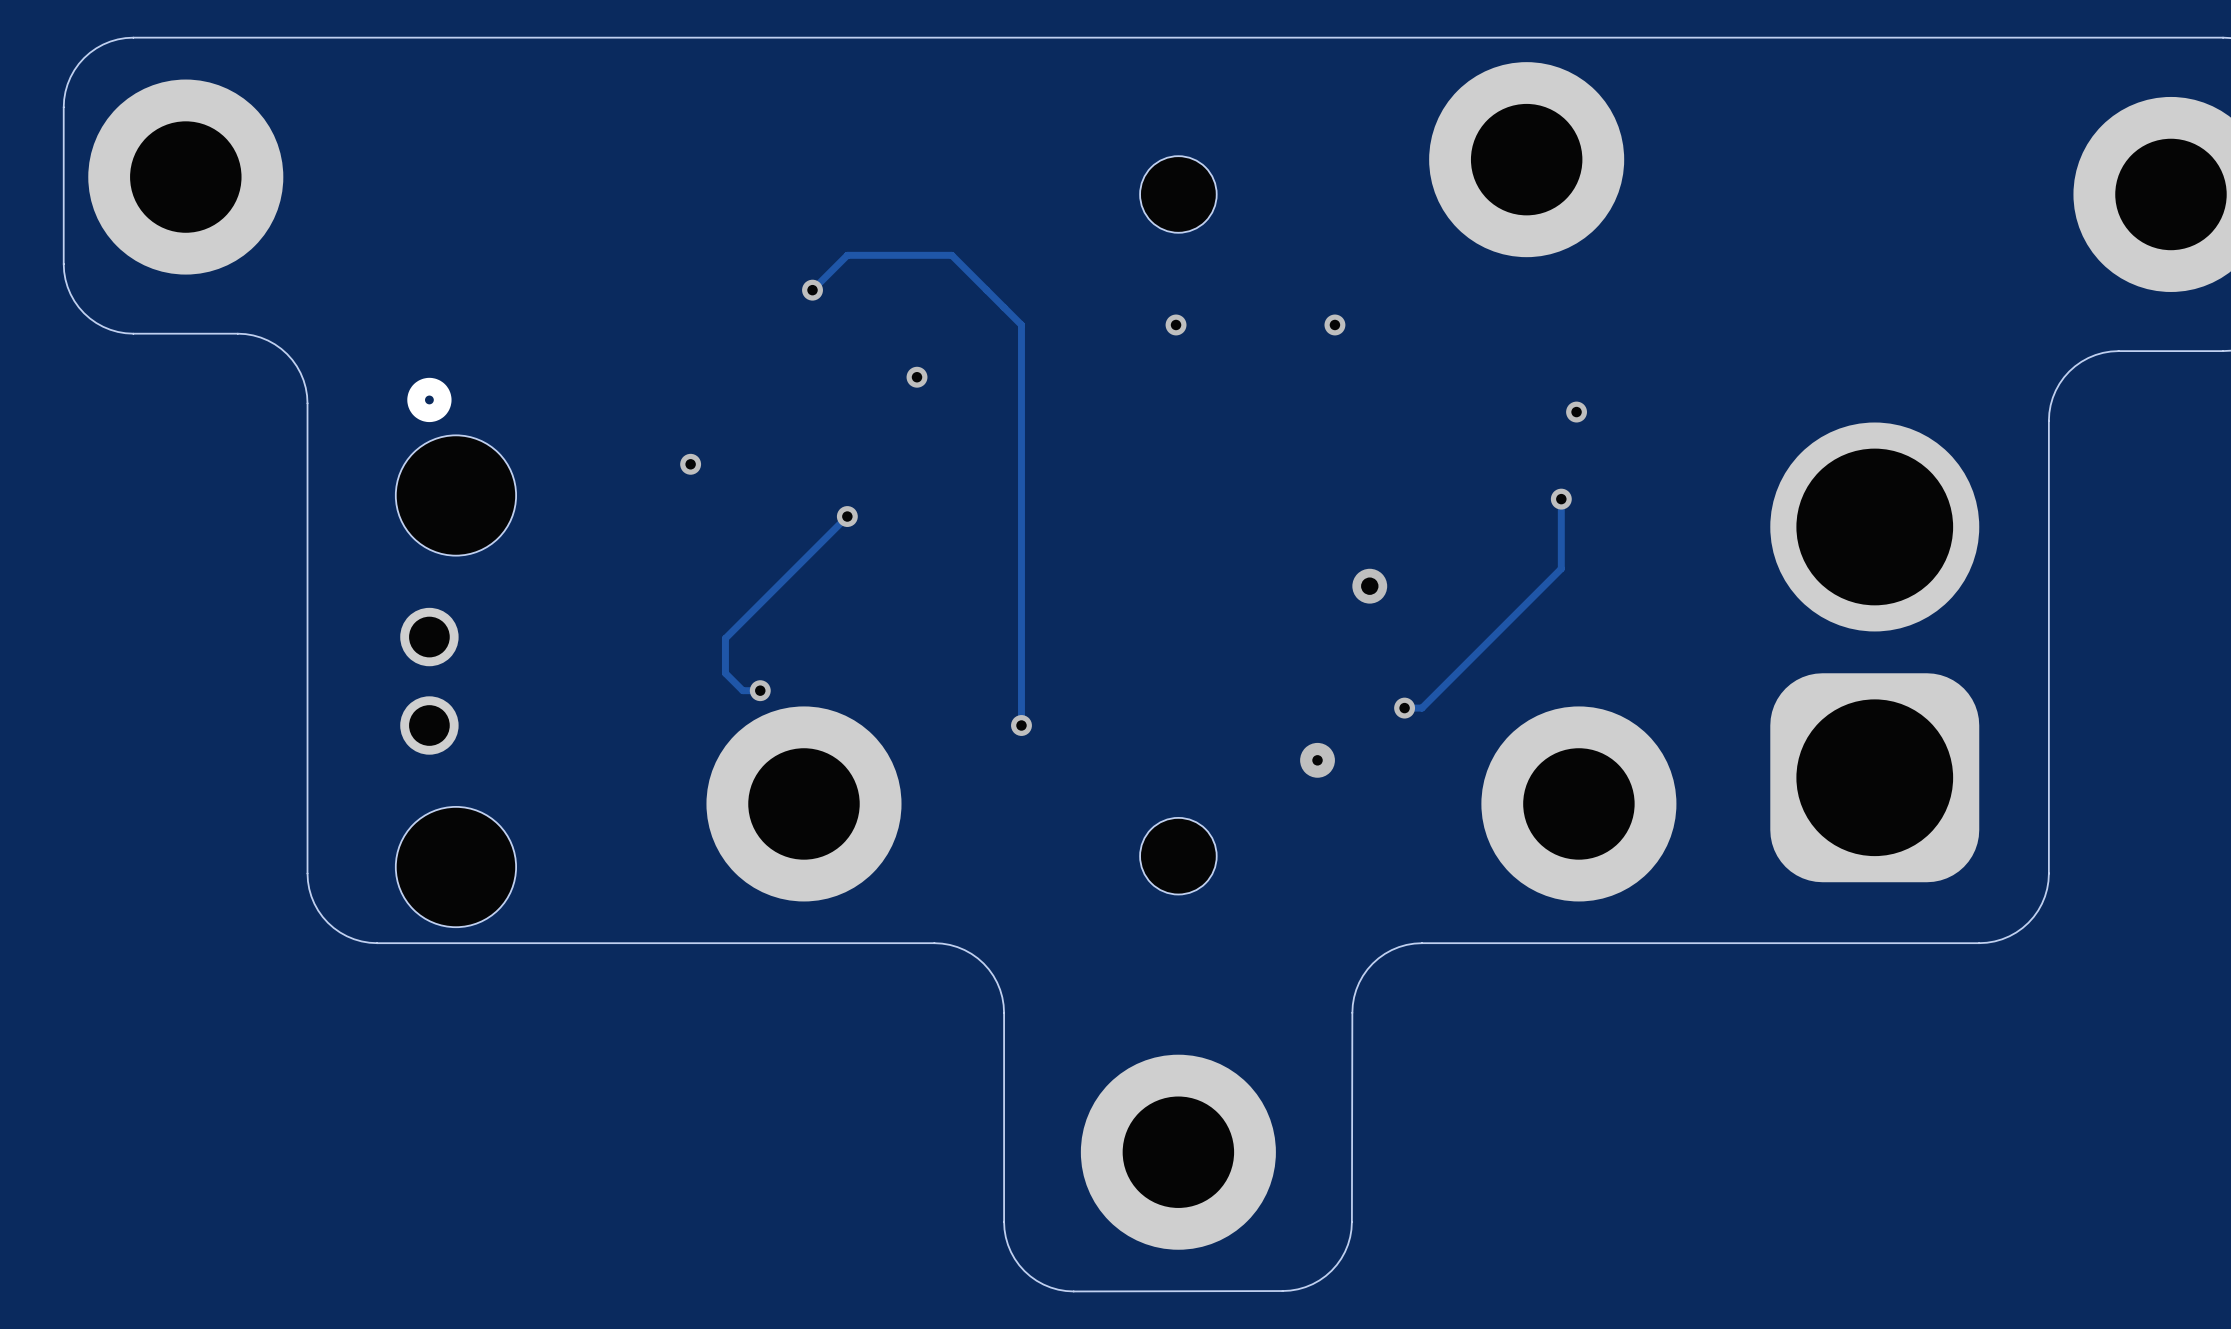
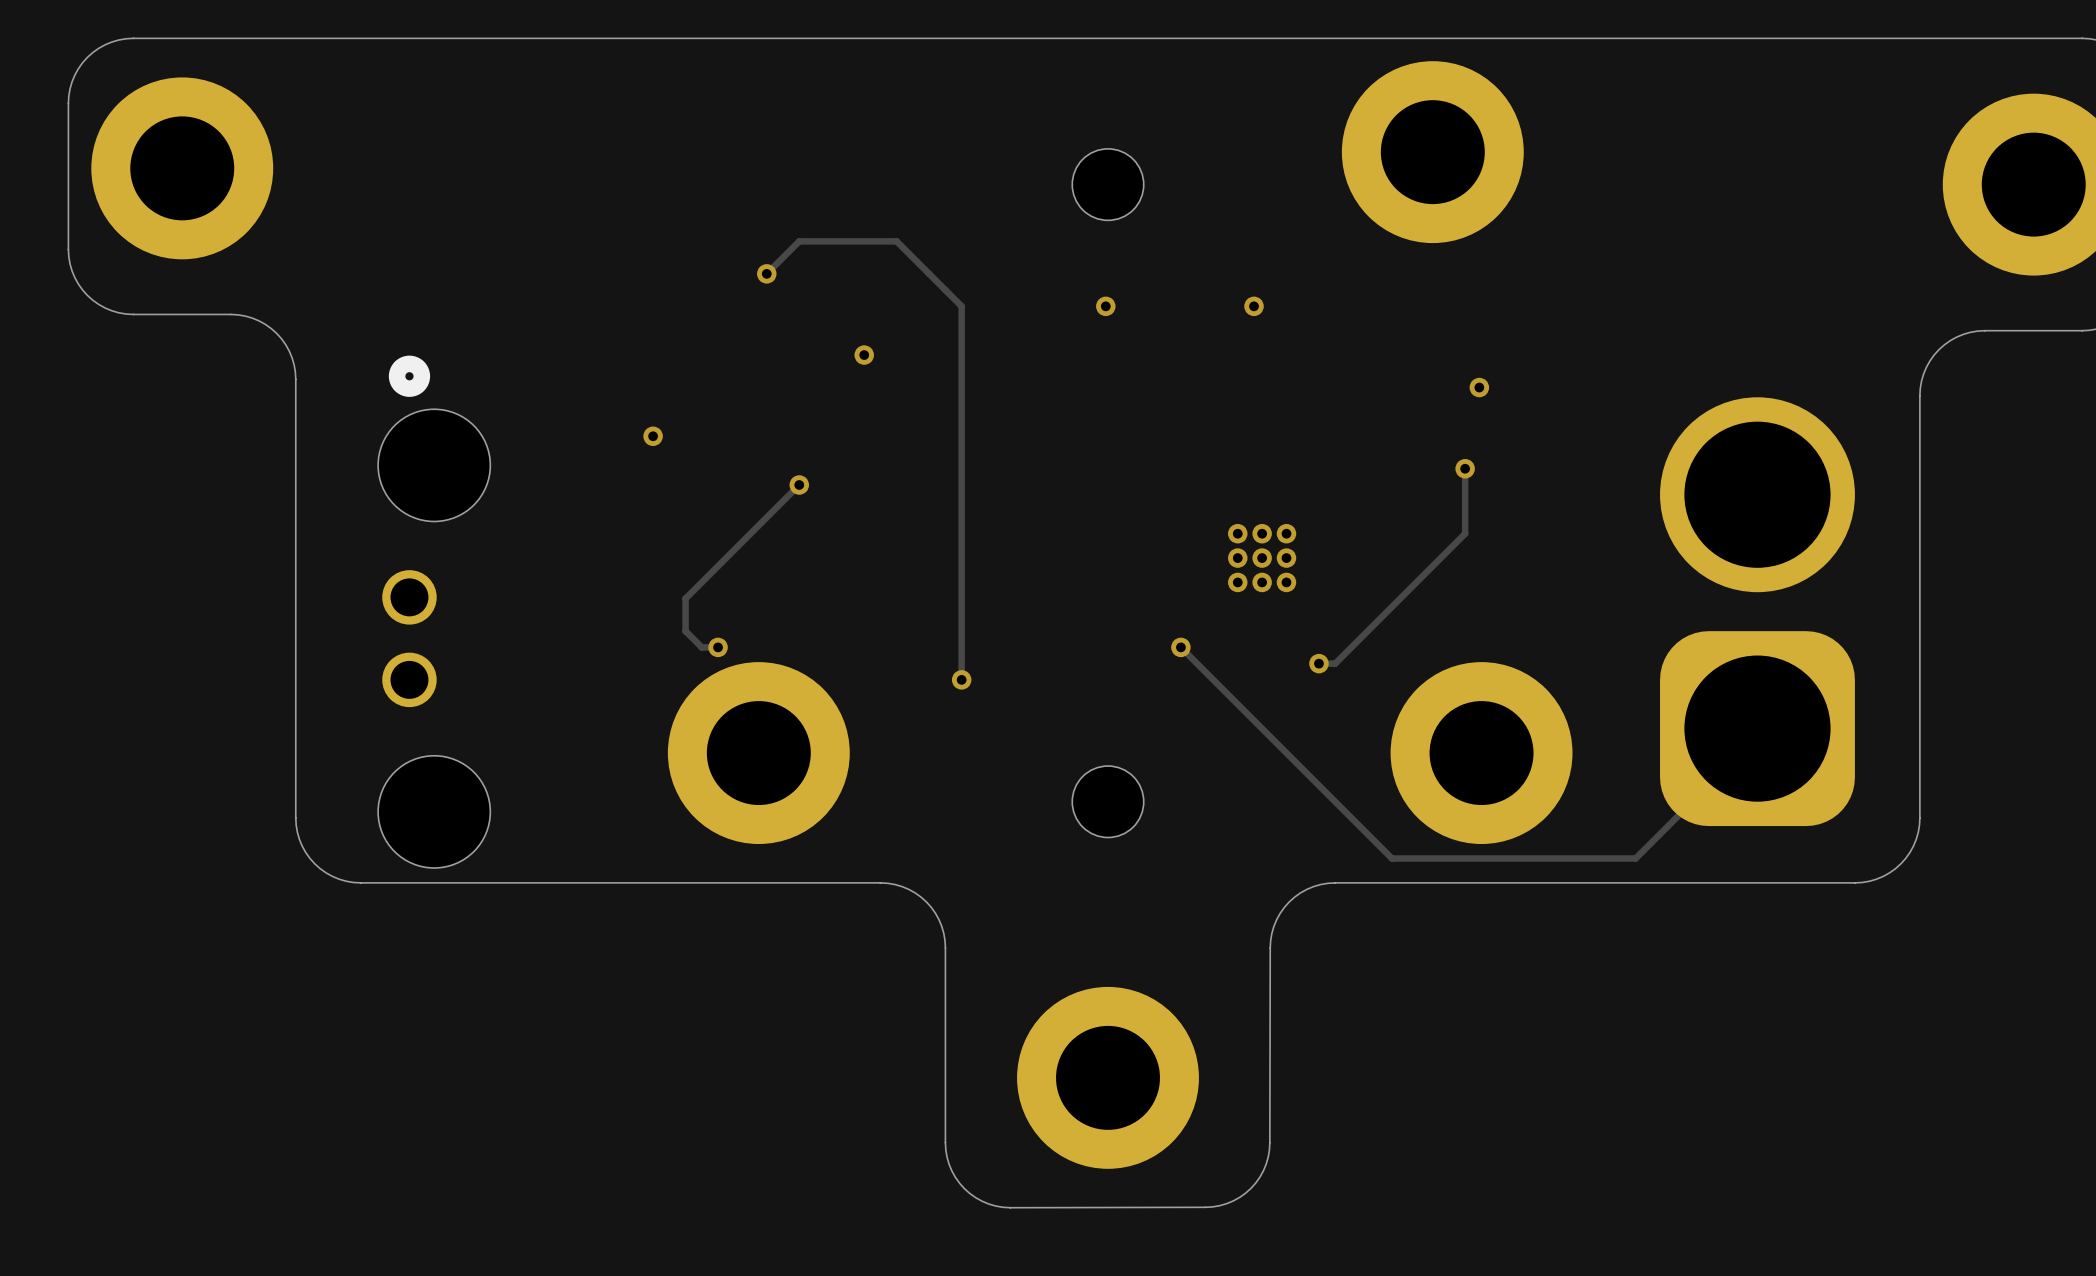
via: none -> (1237, 533)
via: none -> (1262, 533)
via: none -> (1286, 533)
via: (1369, 586) -> none
via: none -> (1237, 558)
via: none -> (1262, 558)
via: none -> (1286, 558)
via: none -> (1237, 582)
via: none -> (1262, 582)
via: none -> (1286, 582)
track: none -> (1180, 647) (1392, 858) (1635, 858) (1700, 793)
via: none -> (1180, 647)
via: (1317, 760) -> none

